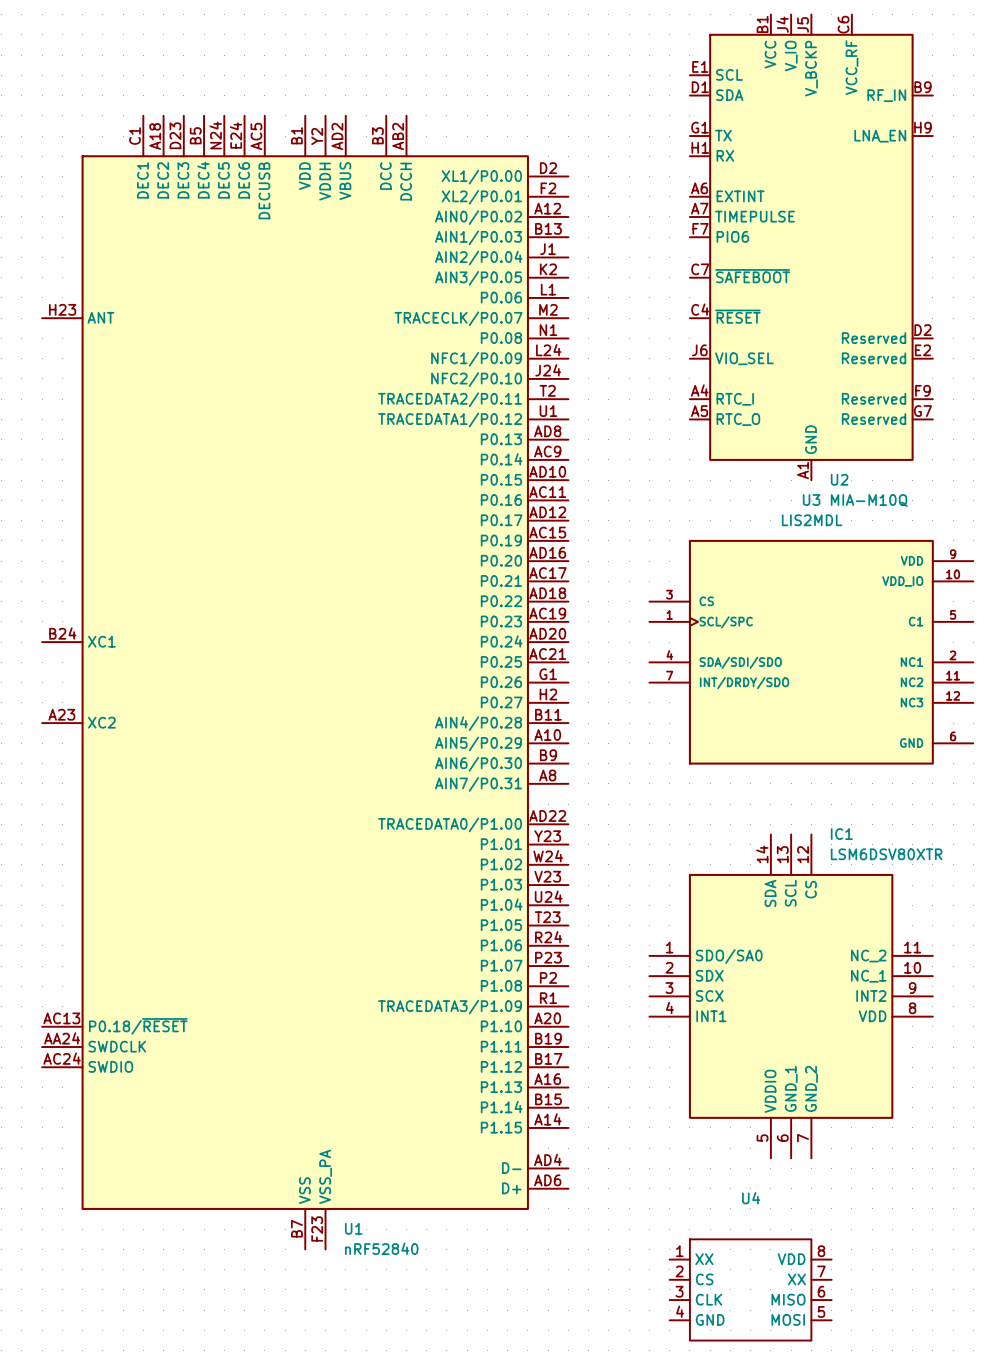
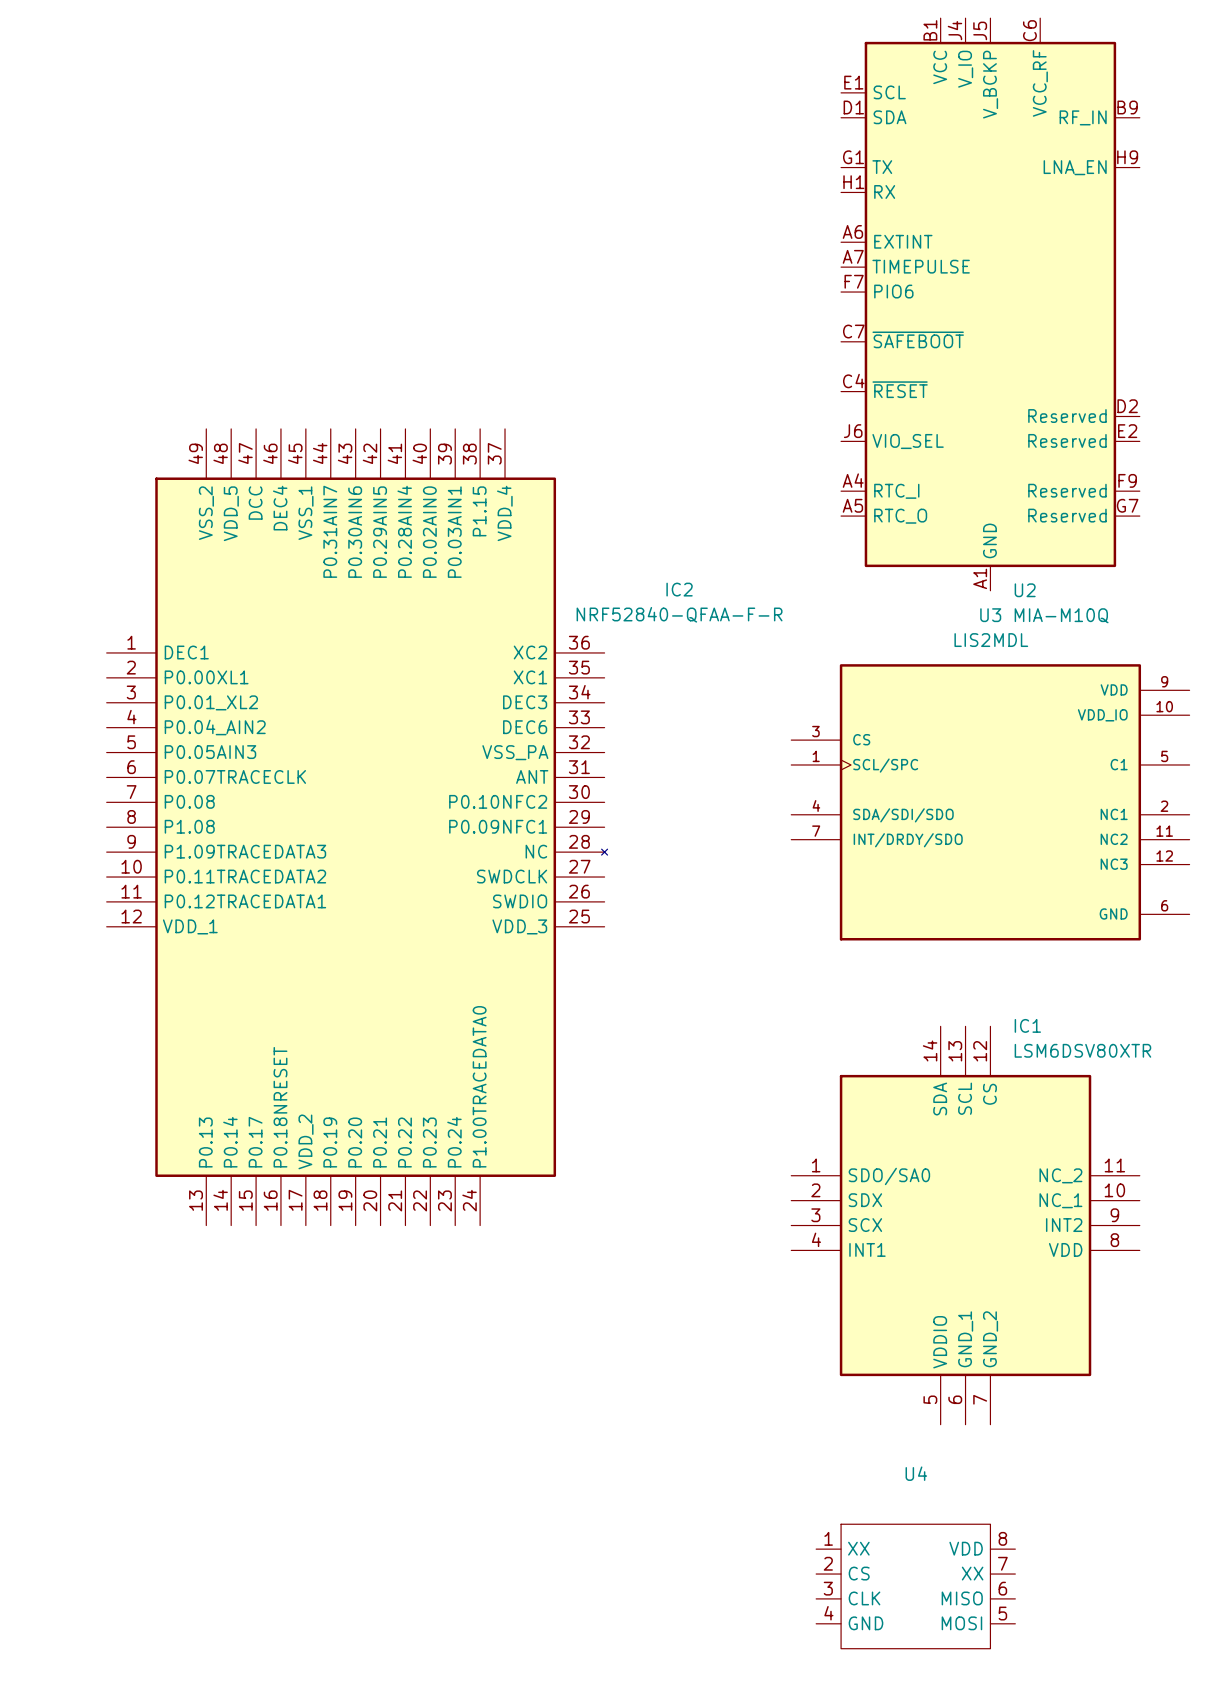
IC2: none -> NRF52840-QFAA-F-R (357, 827)
U1: nRF52840 (305, 682) -> none

